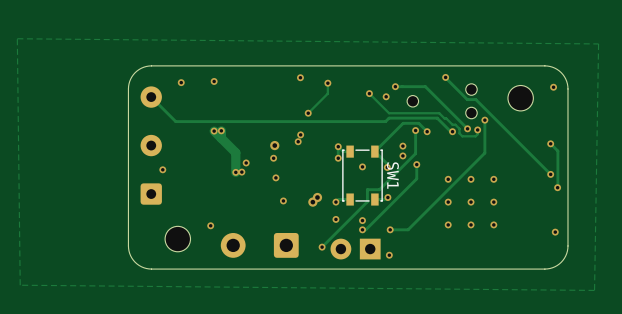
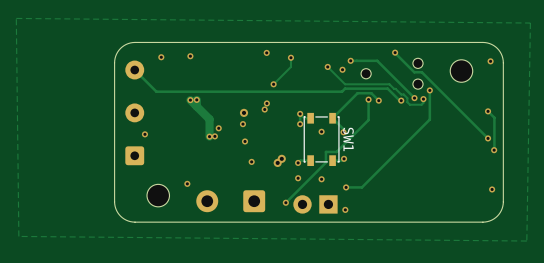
via: (402, 146) -> none
via: (402, 155) -> none
track: (416, 164) (416, 178) (365, 229) (362, 229) -> none
via: (416, 164) -> none
via: (448, 179) -> none
via: (471, 179) -> none
via: (493, 179) -> none
via: (448, 202) -> none
via: (471, 202) -> none
via: (493, 202) -> none
via: (448, 224) -> none
via: (471, 224) -> none
via: (493, 224) -> none
via: (362, 229) -> none

